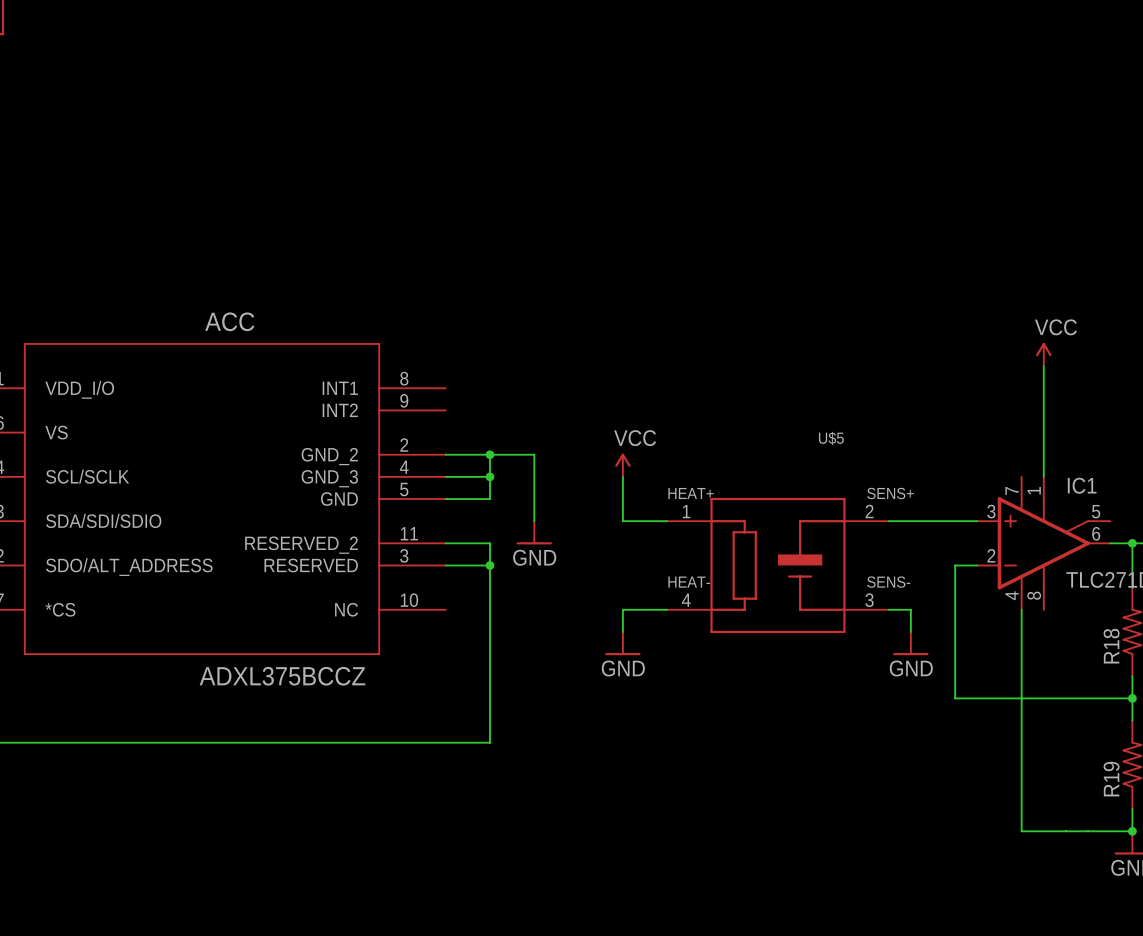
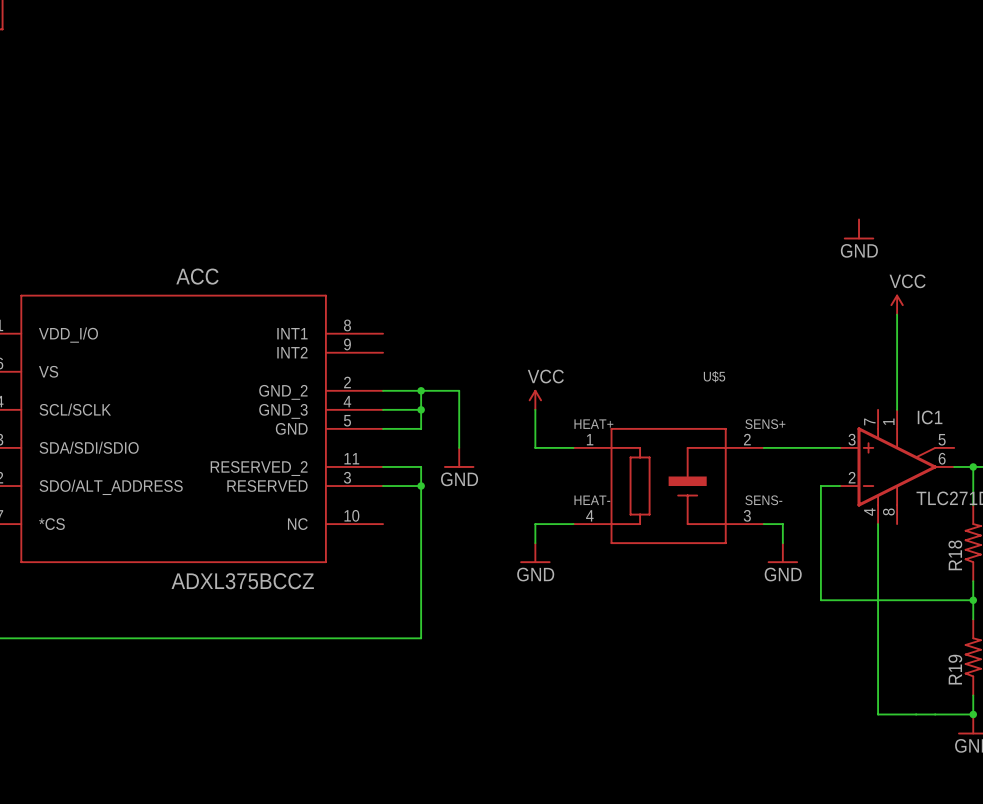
power symbol: none -> GND (859, 229)

